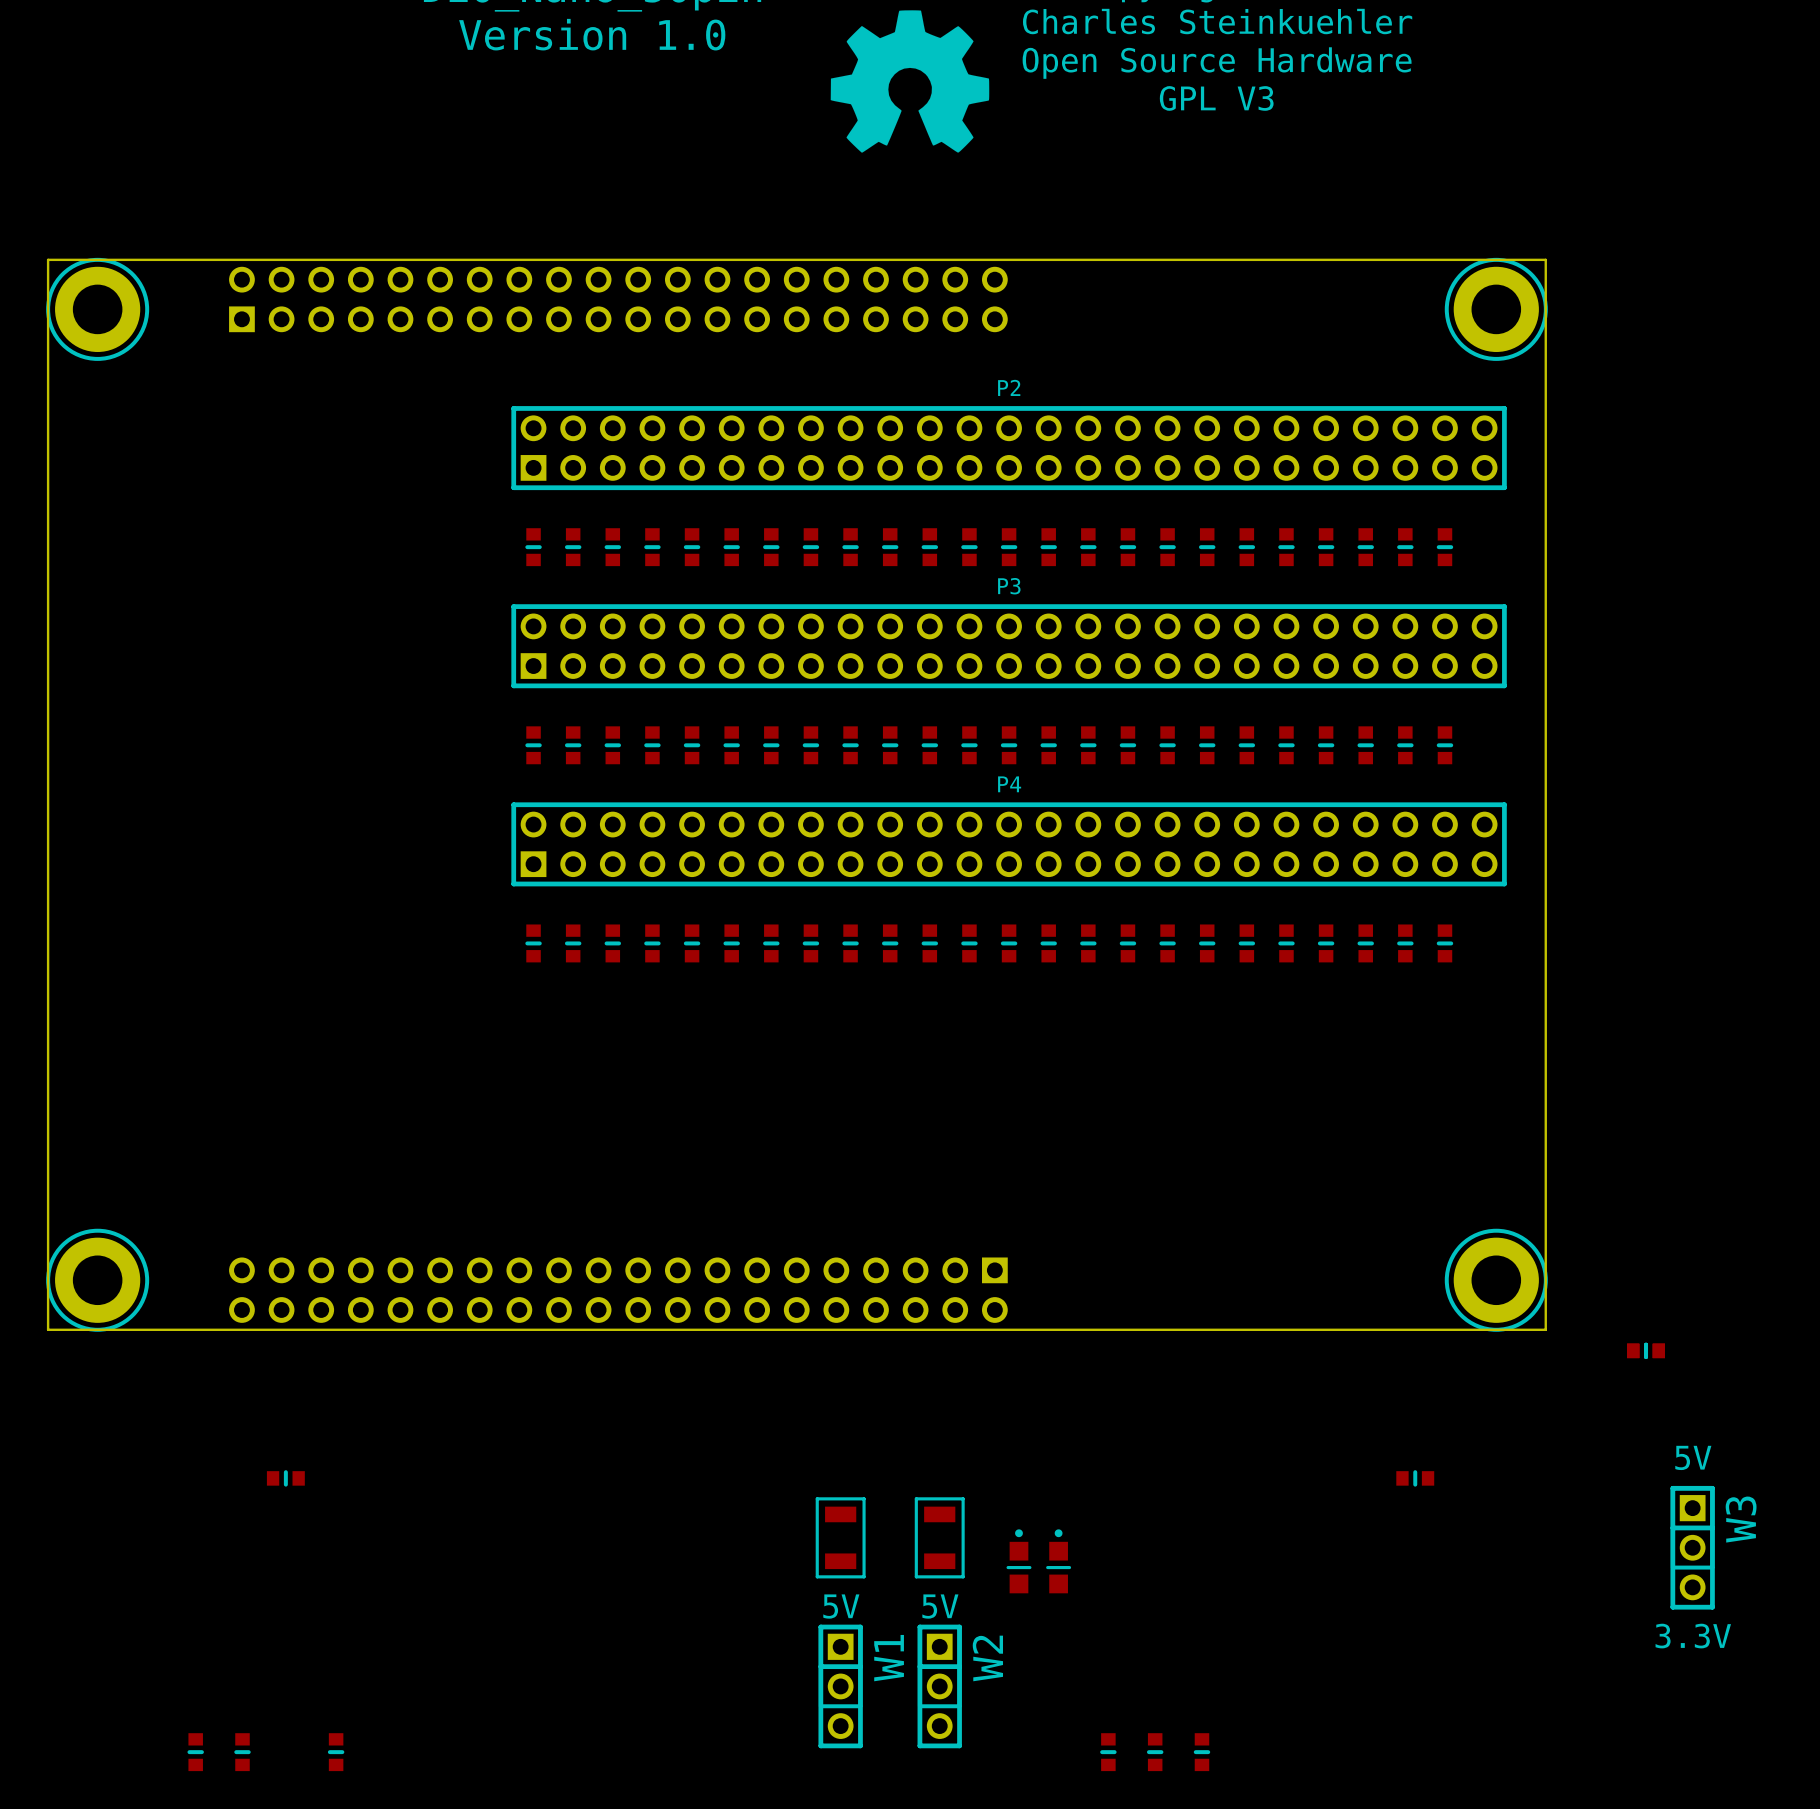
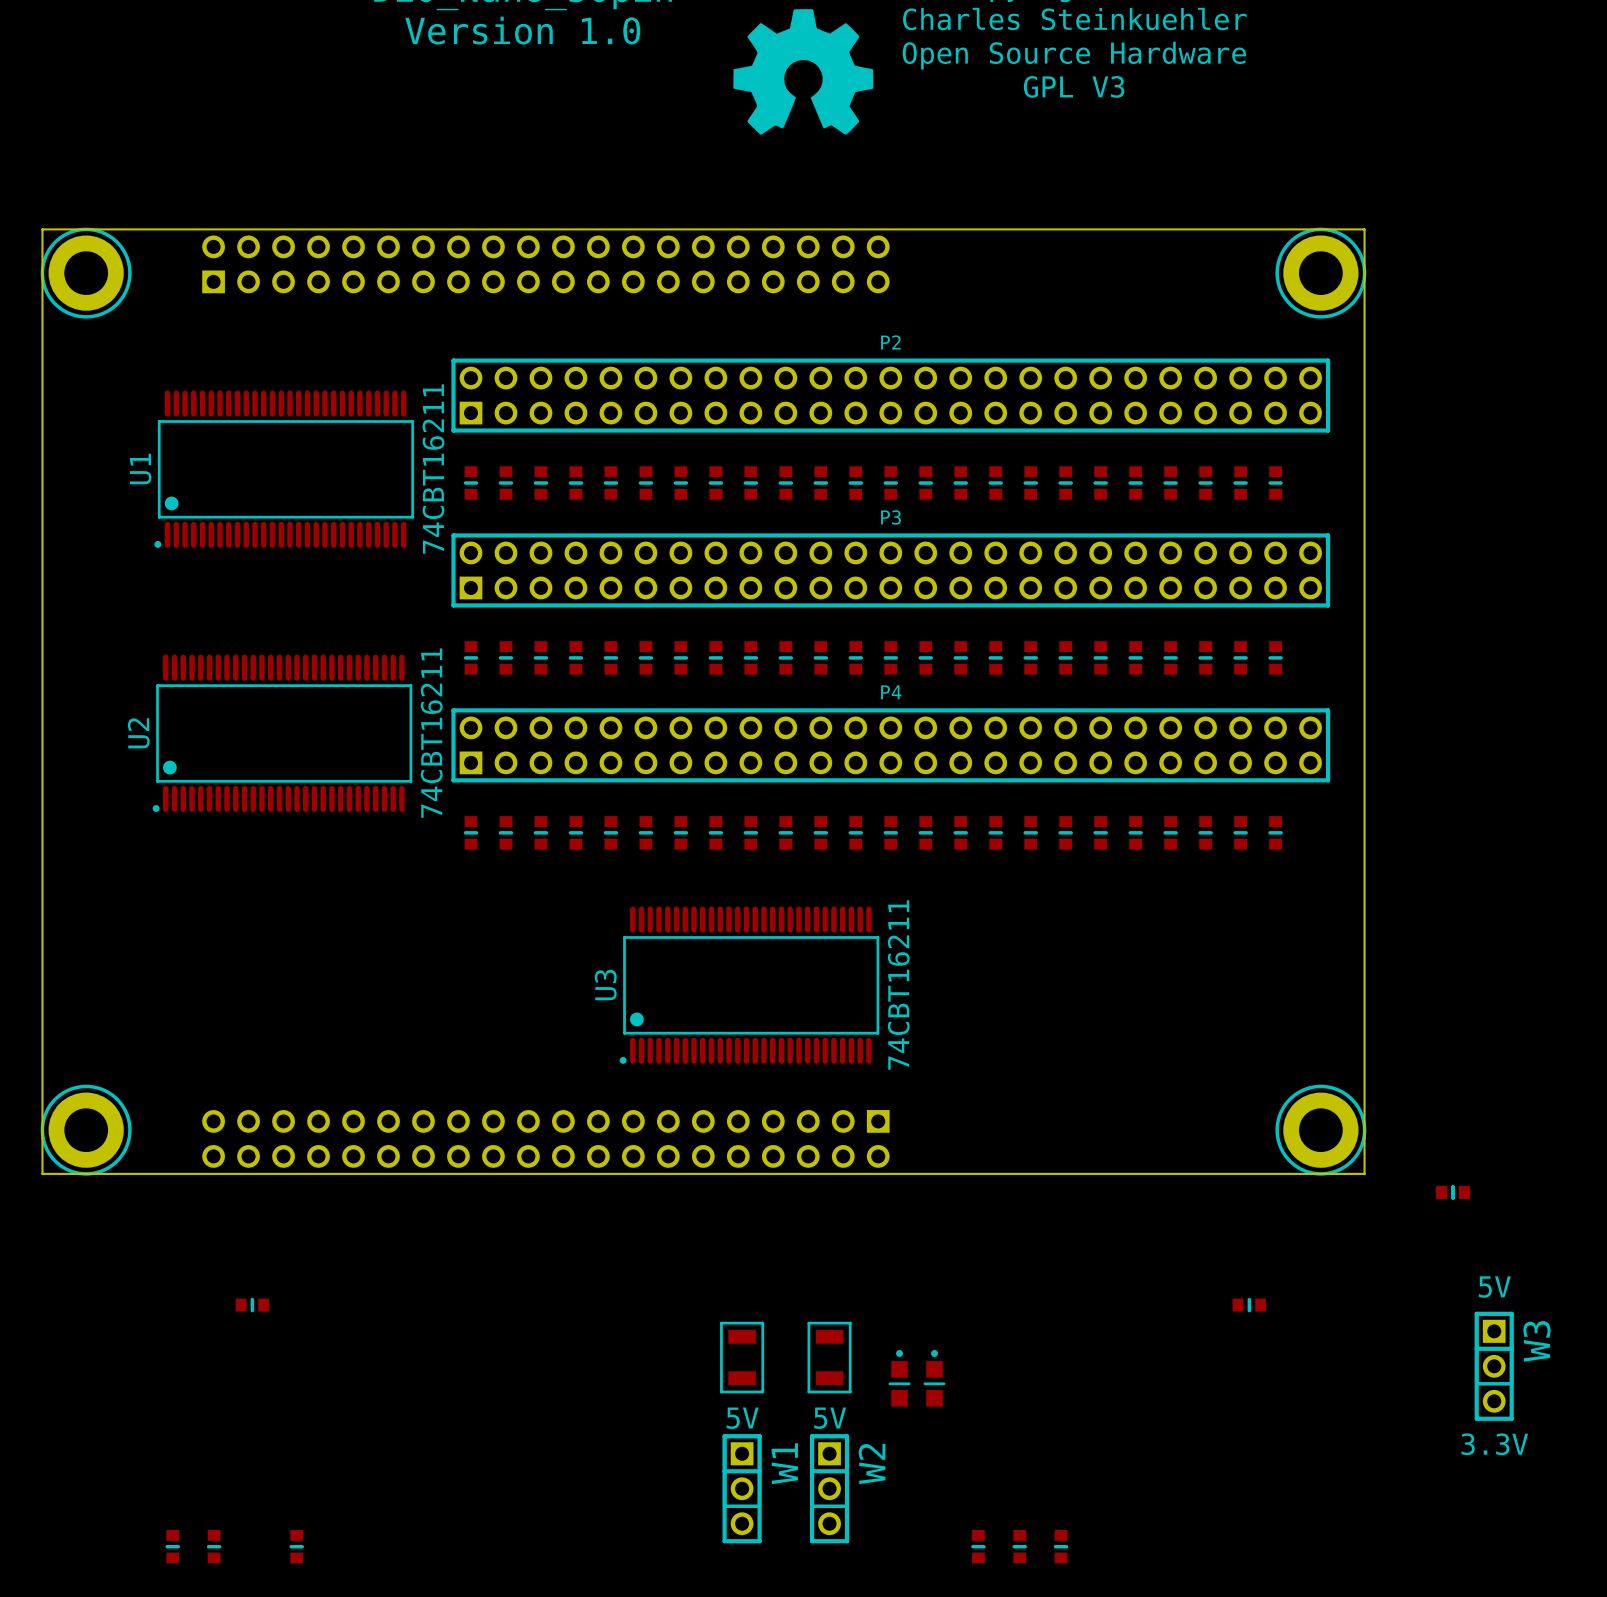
U1: none -> 74CBT16211 (284, 469)
U2: none -> 74CBT16211 (282, 733)
U3: none -> 74CBT16211 (749, 985)

